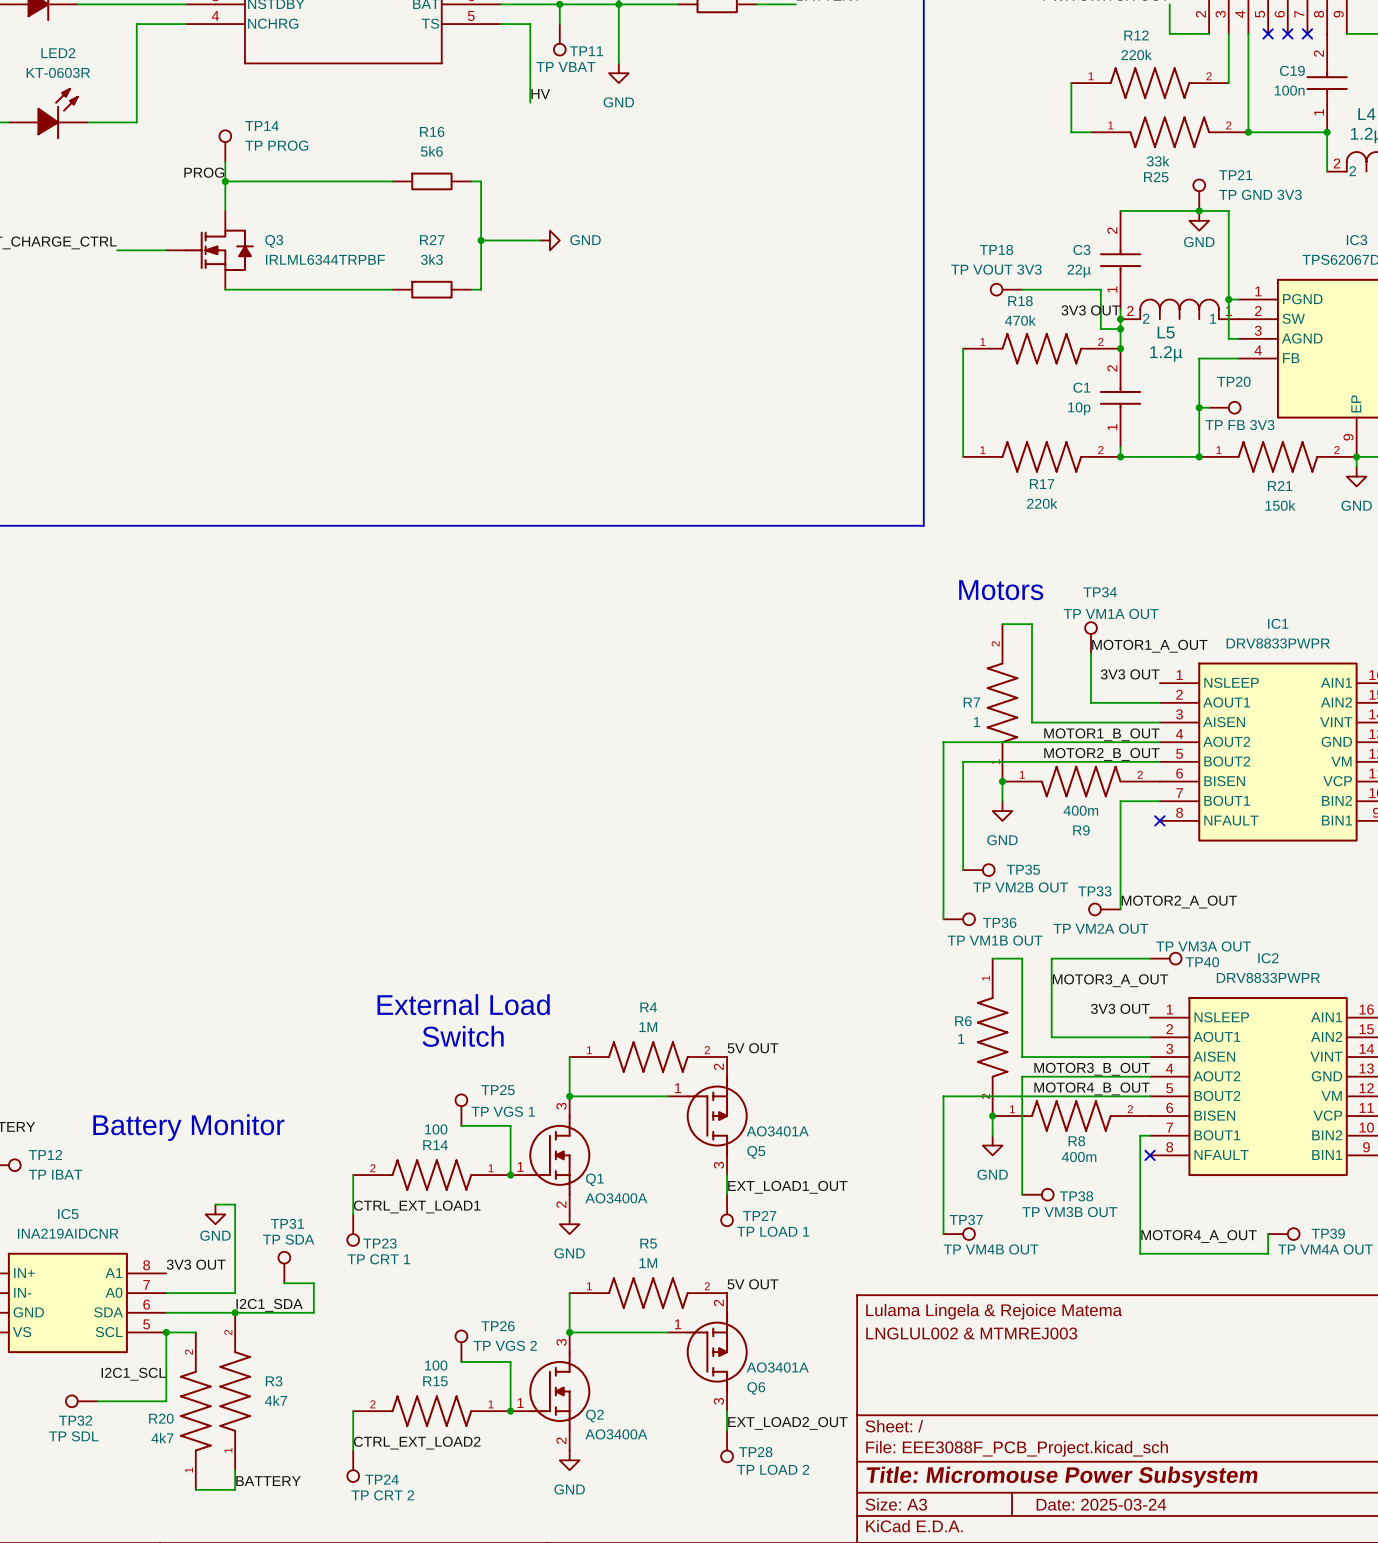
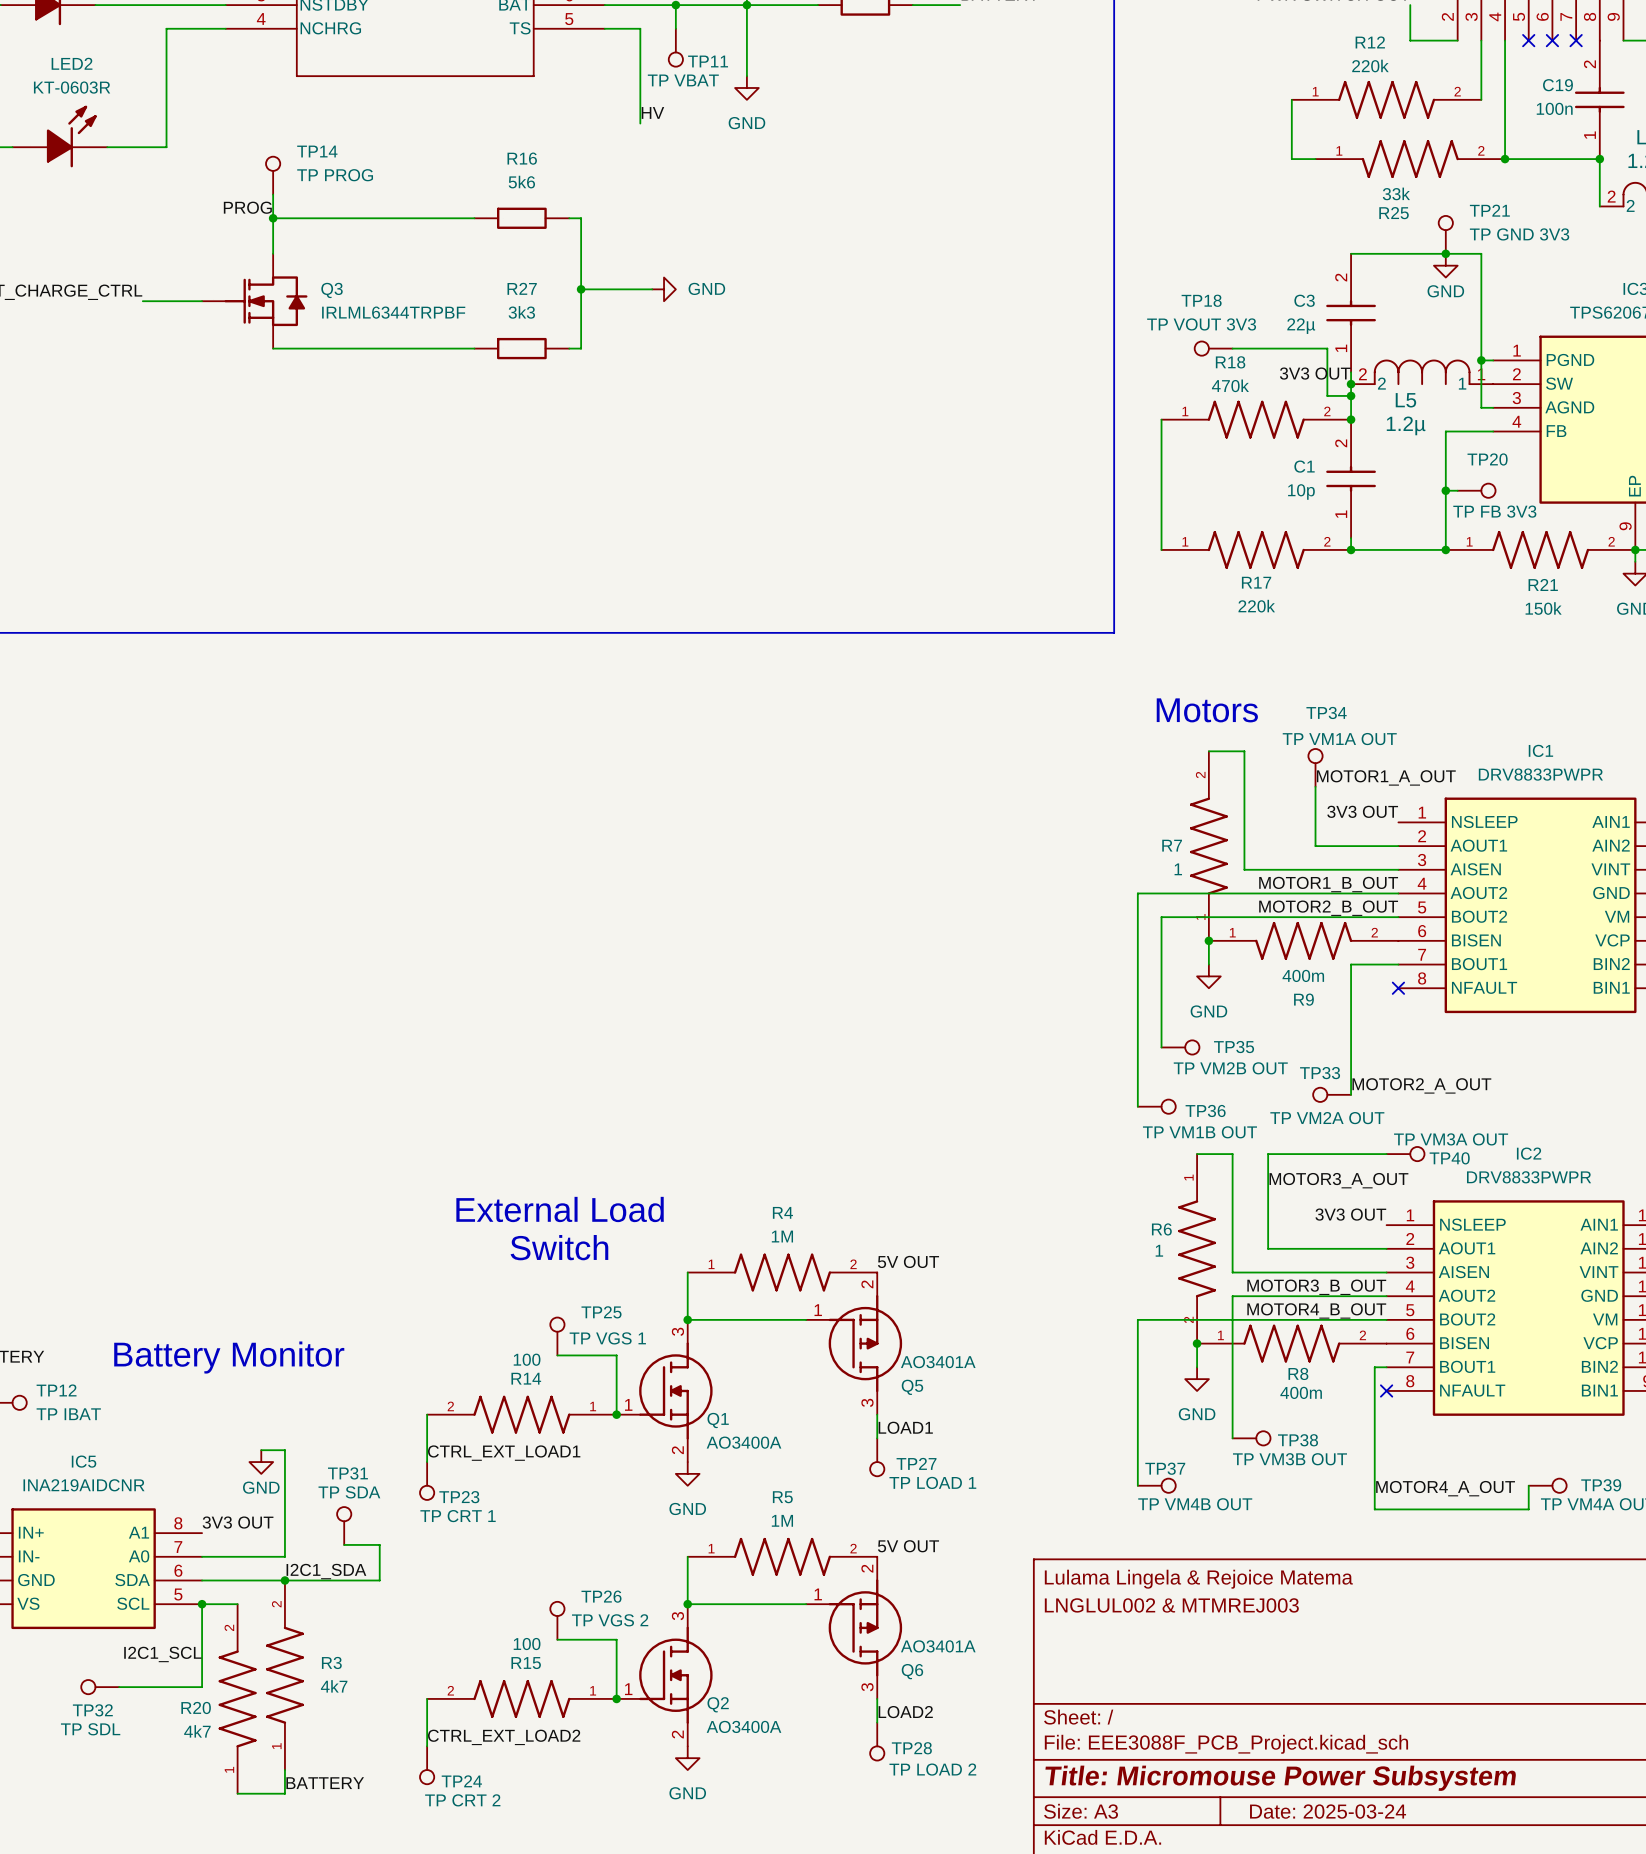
label: EXT_LOAD1_OUT (787, 1187) -> LOAD1 (905, 1427)
label: EXT_LOAD2_OUT (787, 1423) -> LOAD2 (905, 1712)

